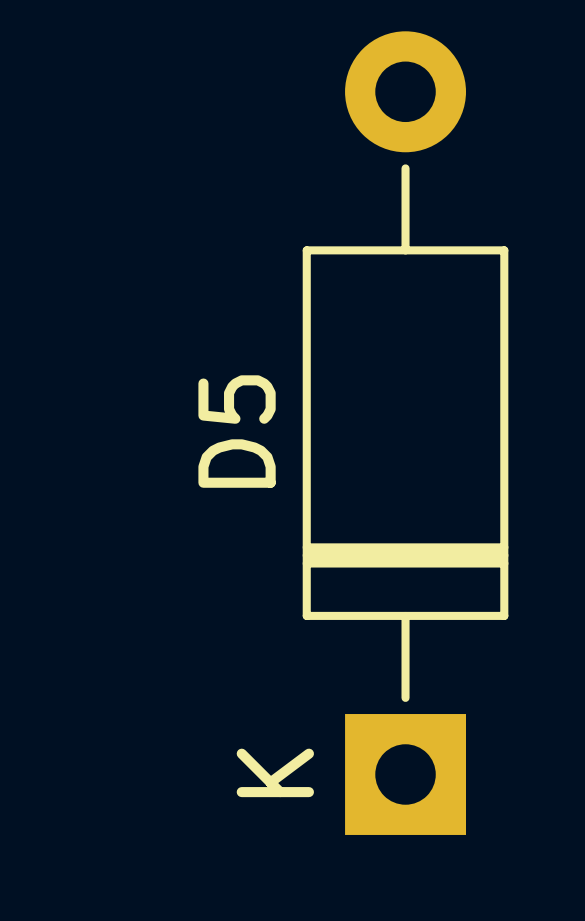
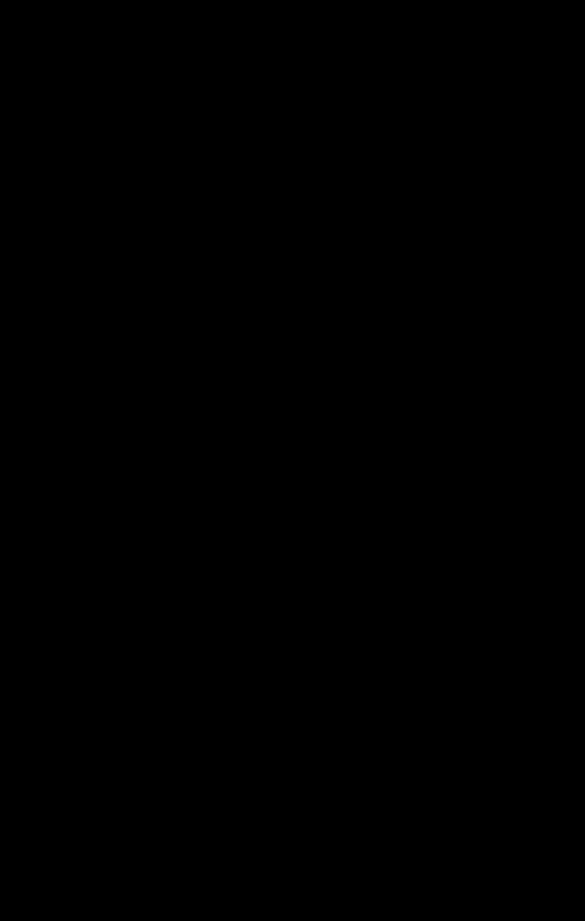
D5: (405, 433) -> none

